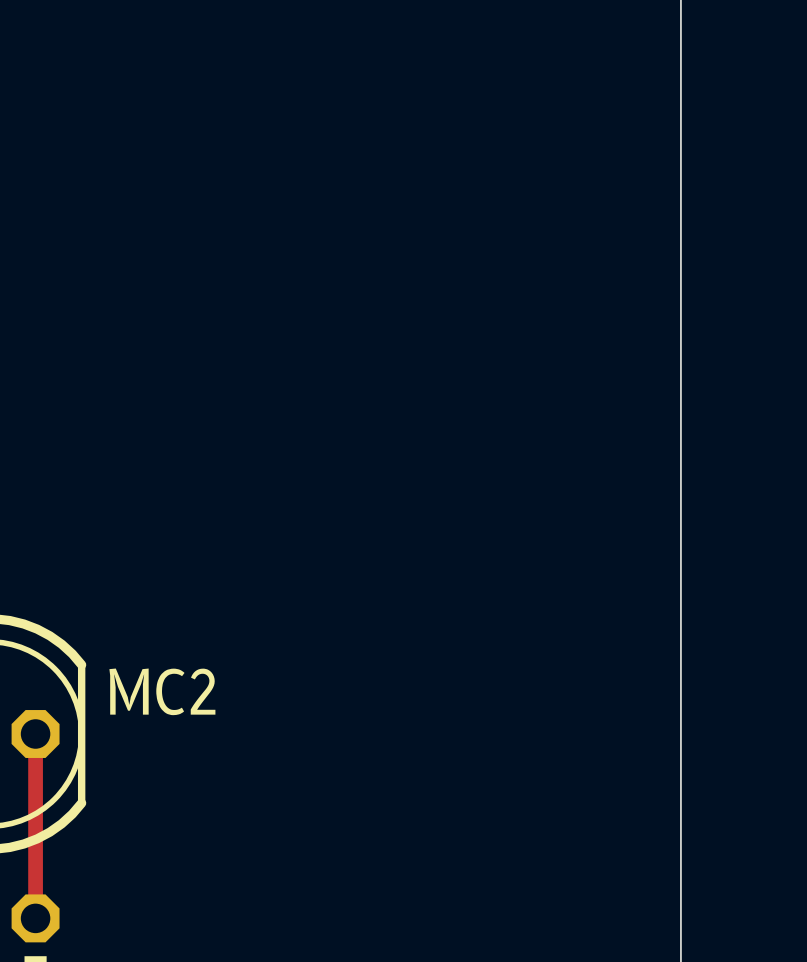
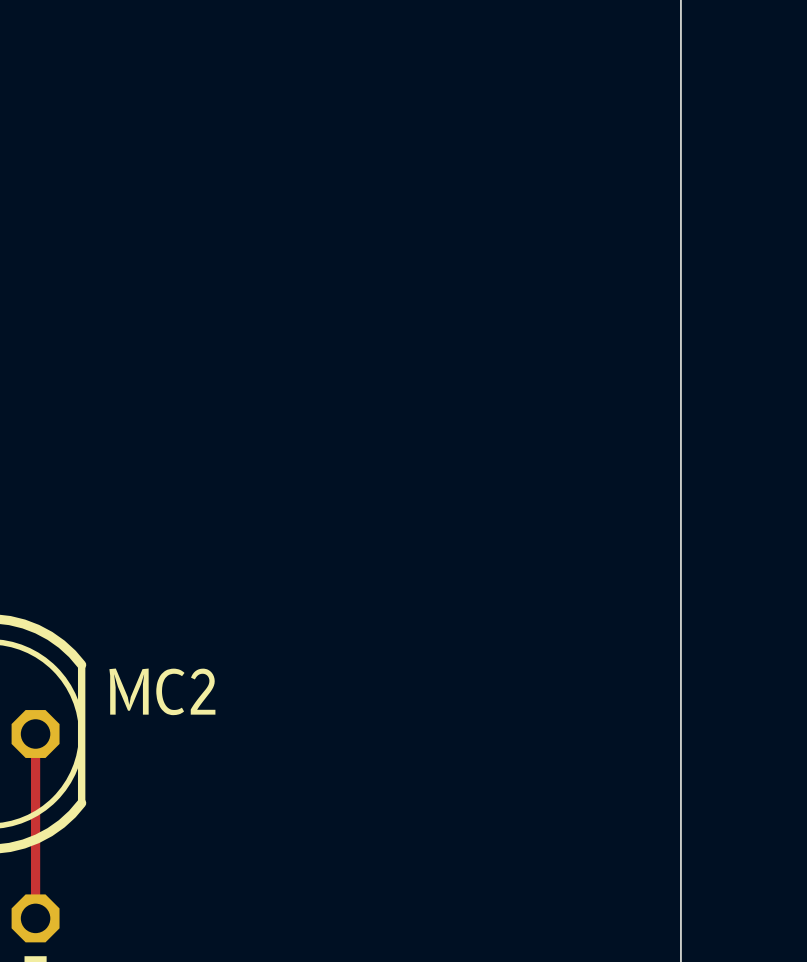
top track width: thick (35, 734) (35, 918) -> thin (35, 734) (35, 918)

